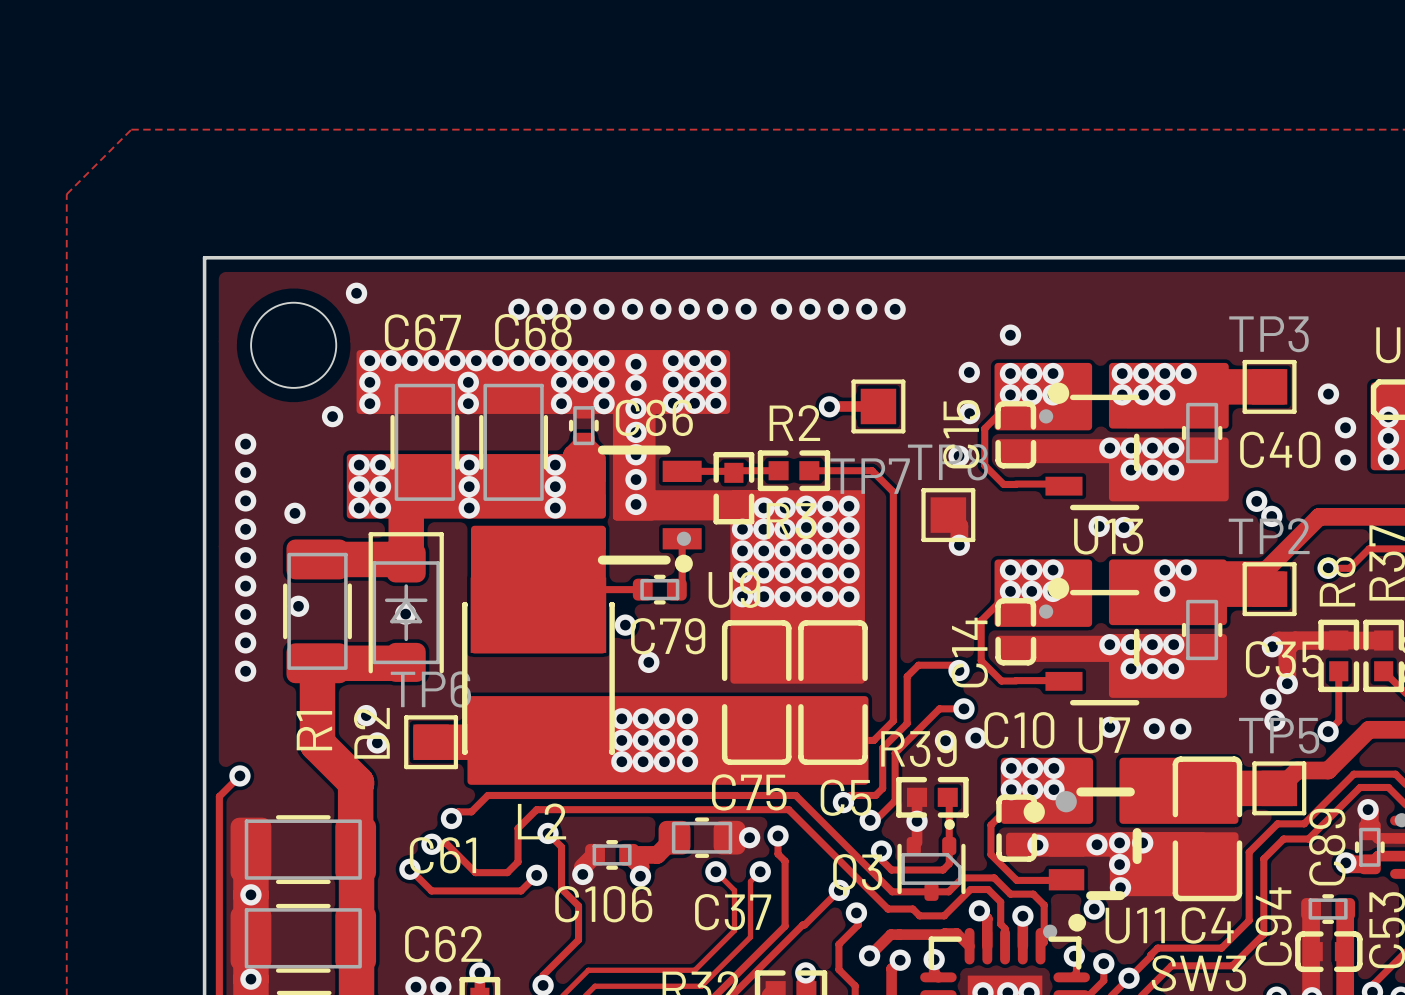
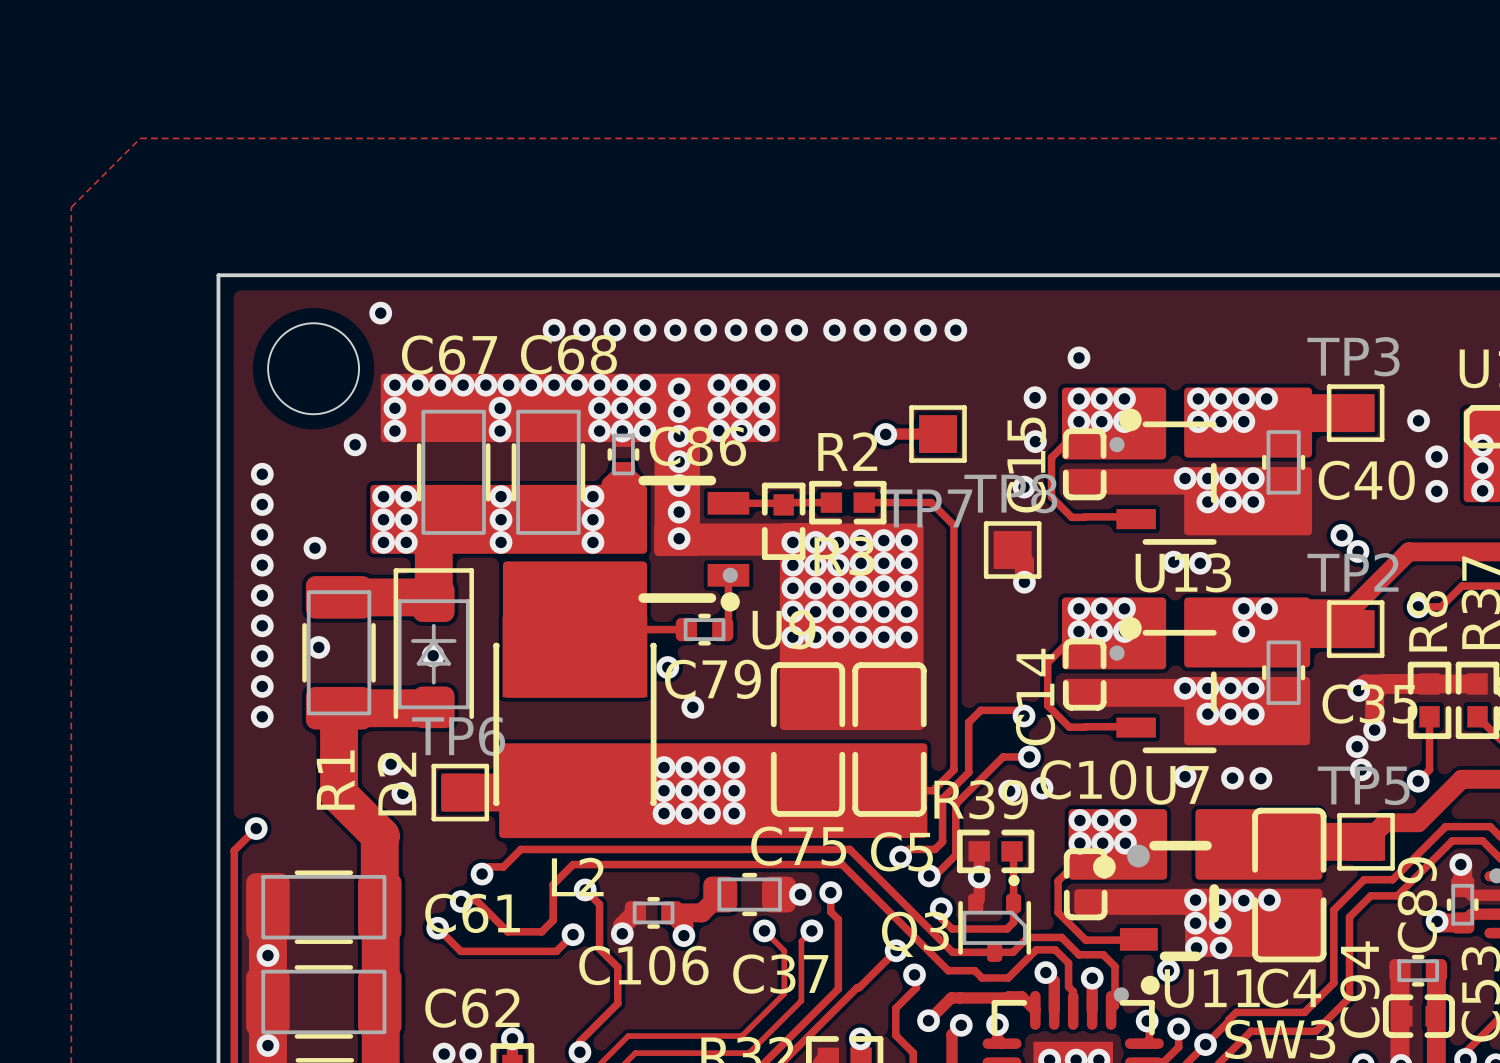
via: none -> (622, 431)
via: none -> (792, 542)
via: none -> (1269, 900)
via: none -> (1243, 900)
via: (1096, 844) -> none
via: (1037, 845) -> none
via: none -> (1220, 923)
via: none -> (1221, 947)

